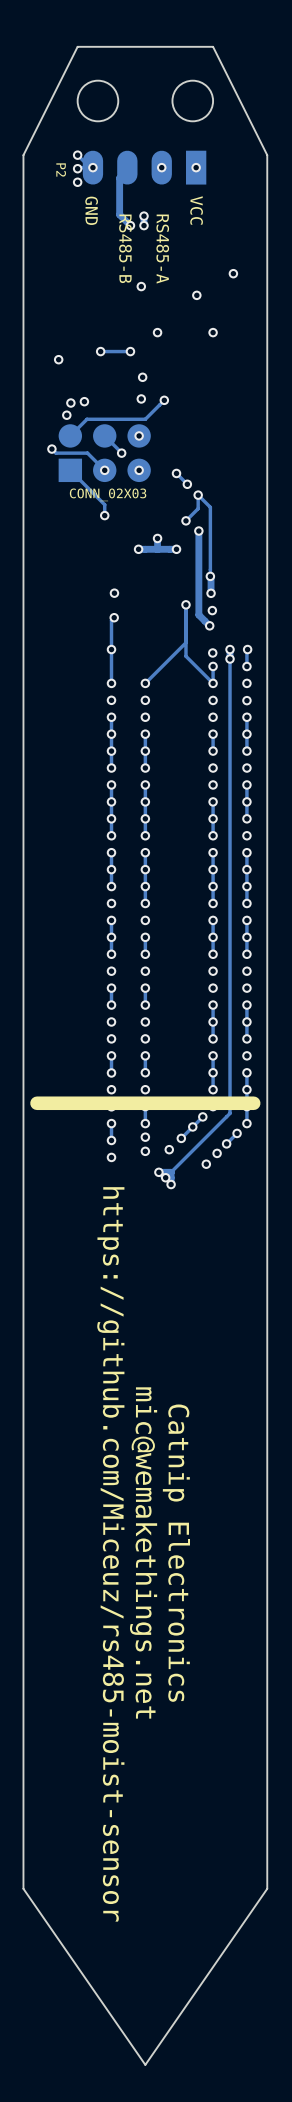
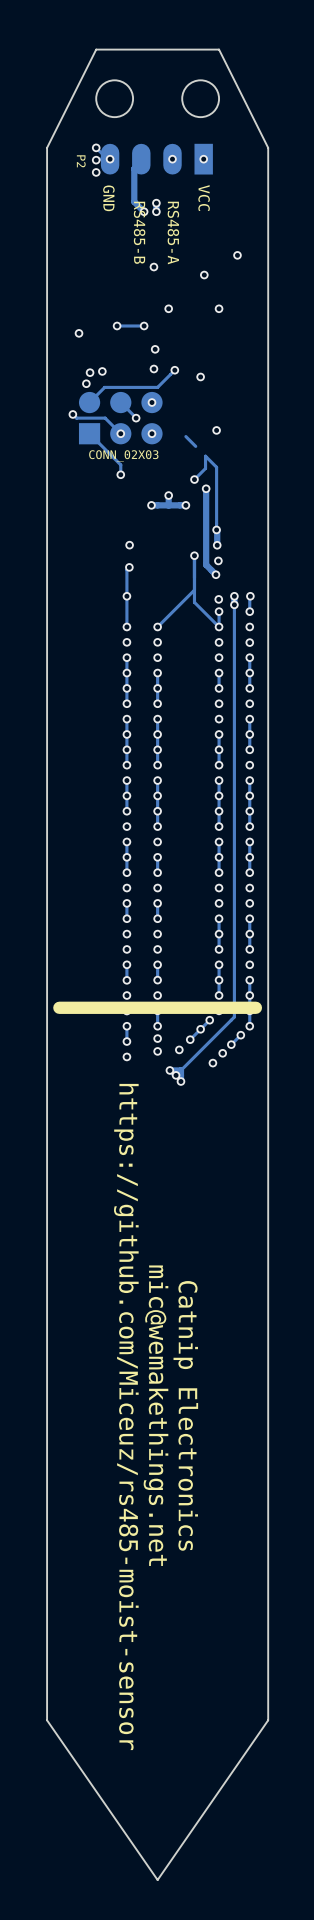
via: none -> (200, 376)
via: none -> (216, 430)
via: (176, 473) -> none
via: (187, 484) -> none
via: (198, 495) -> none

